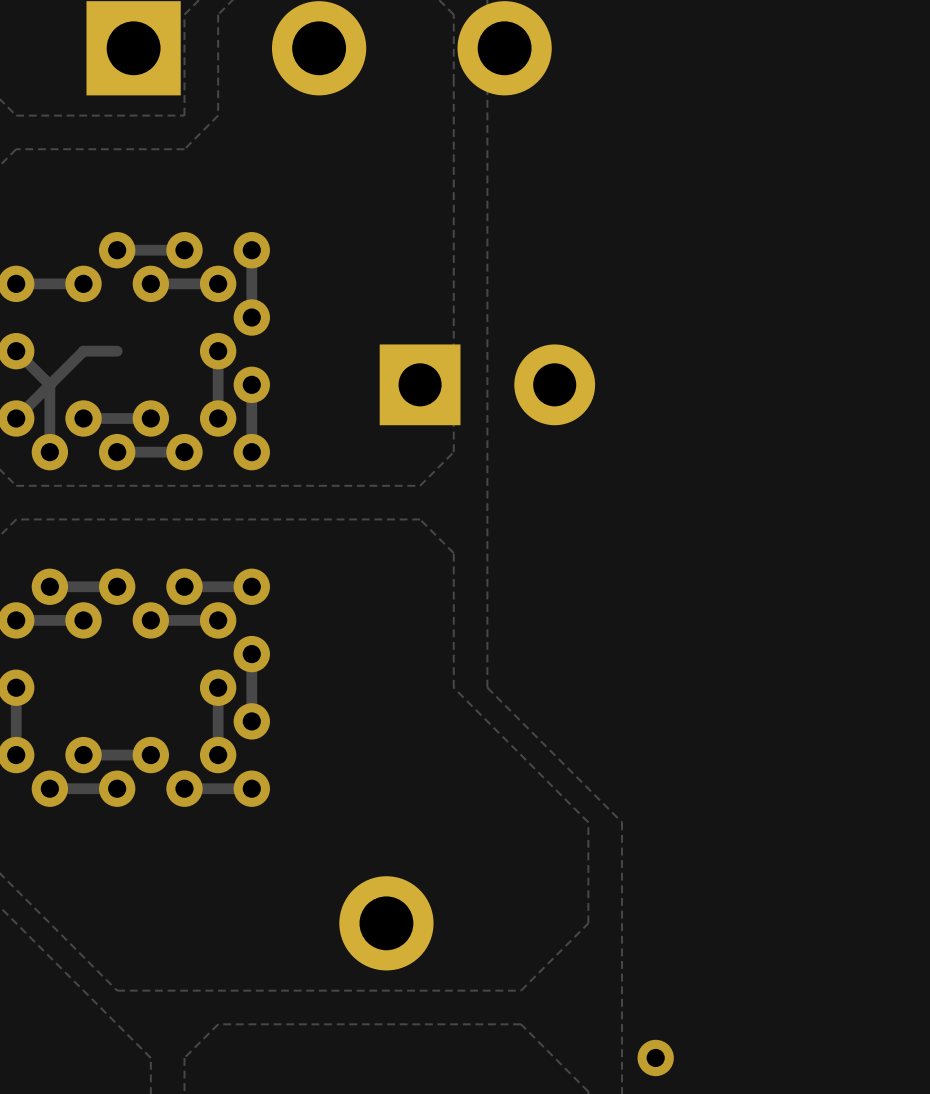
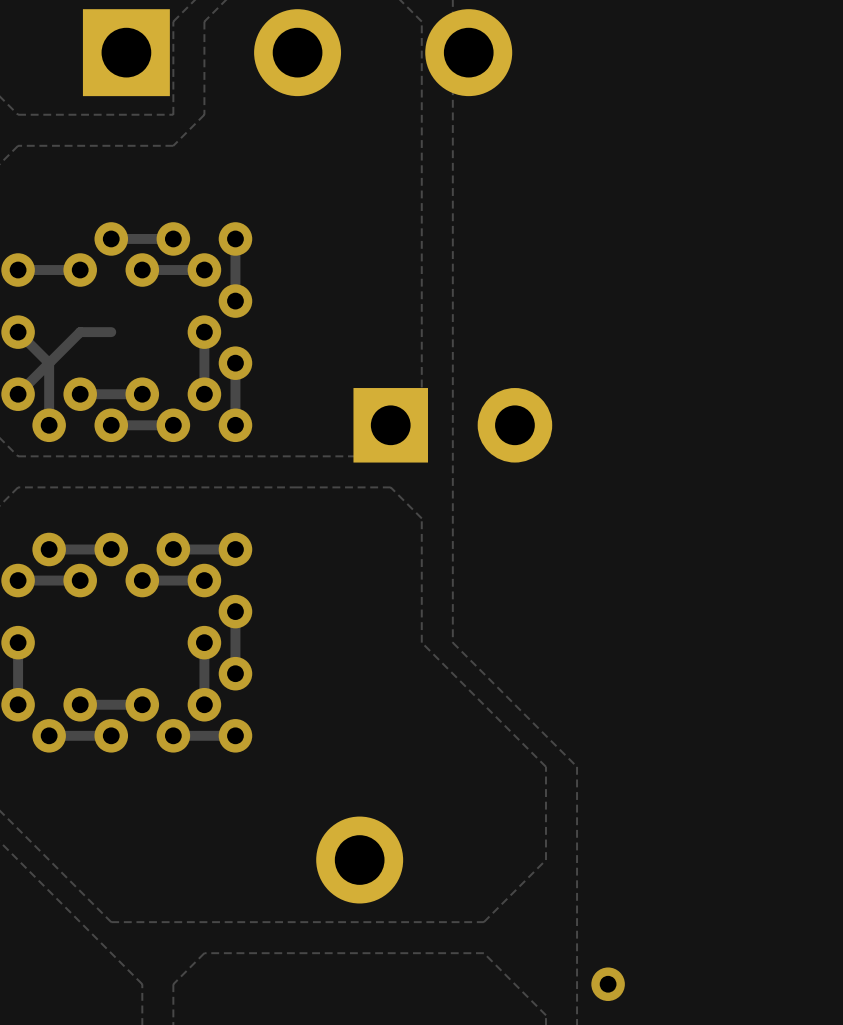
part position: (487, 384) -> (452, 425)

